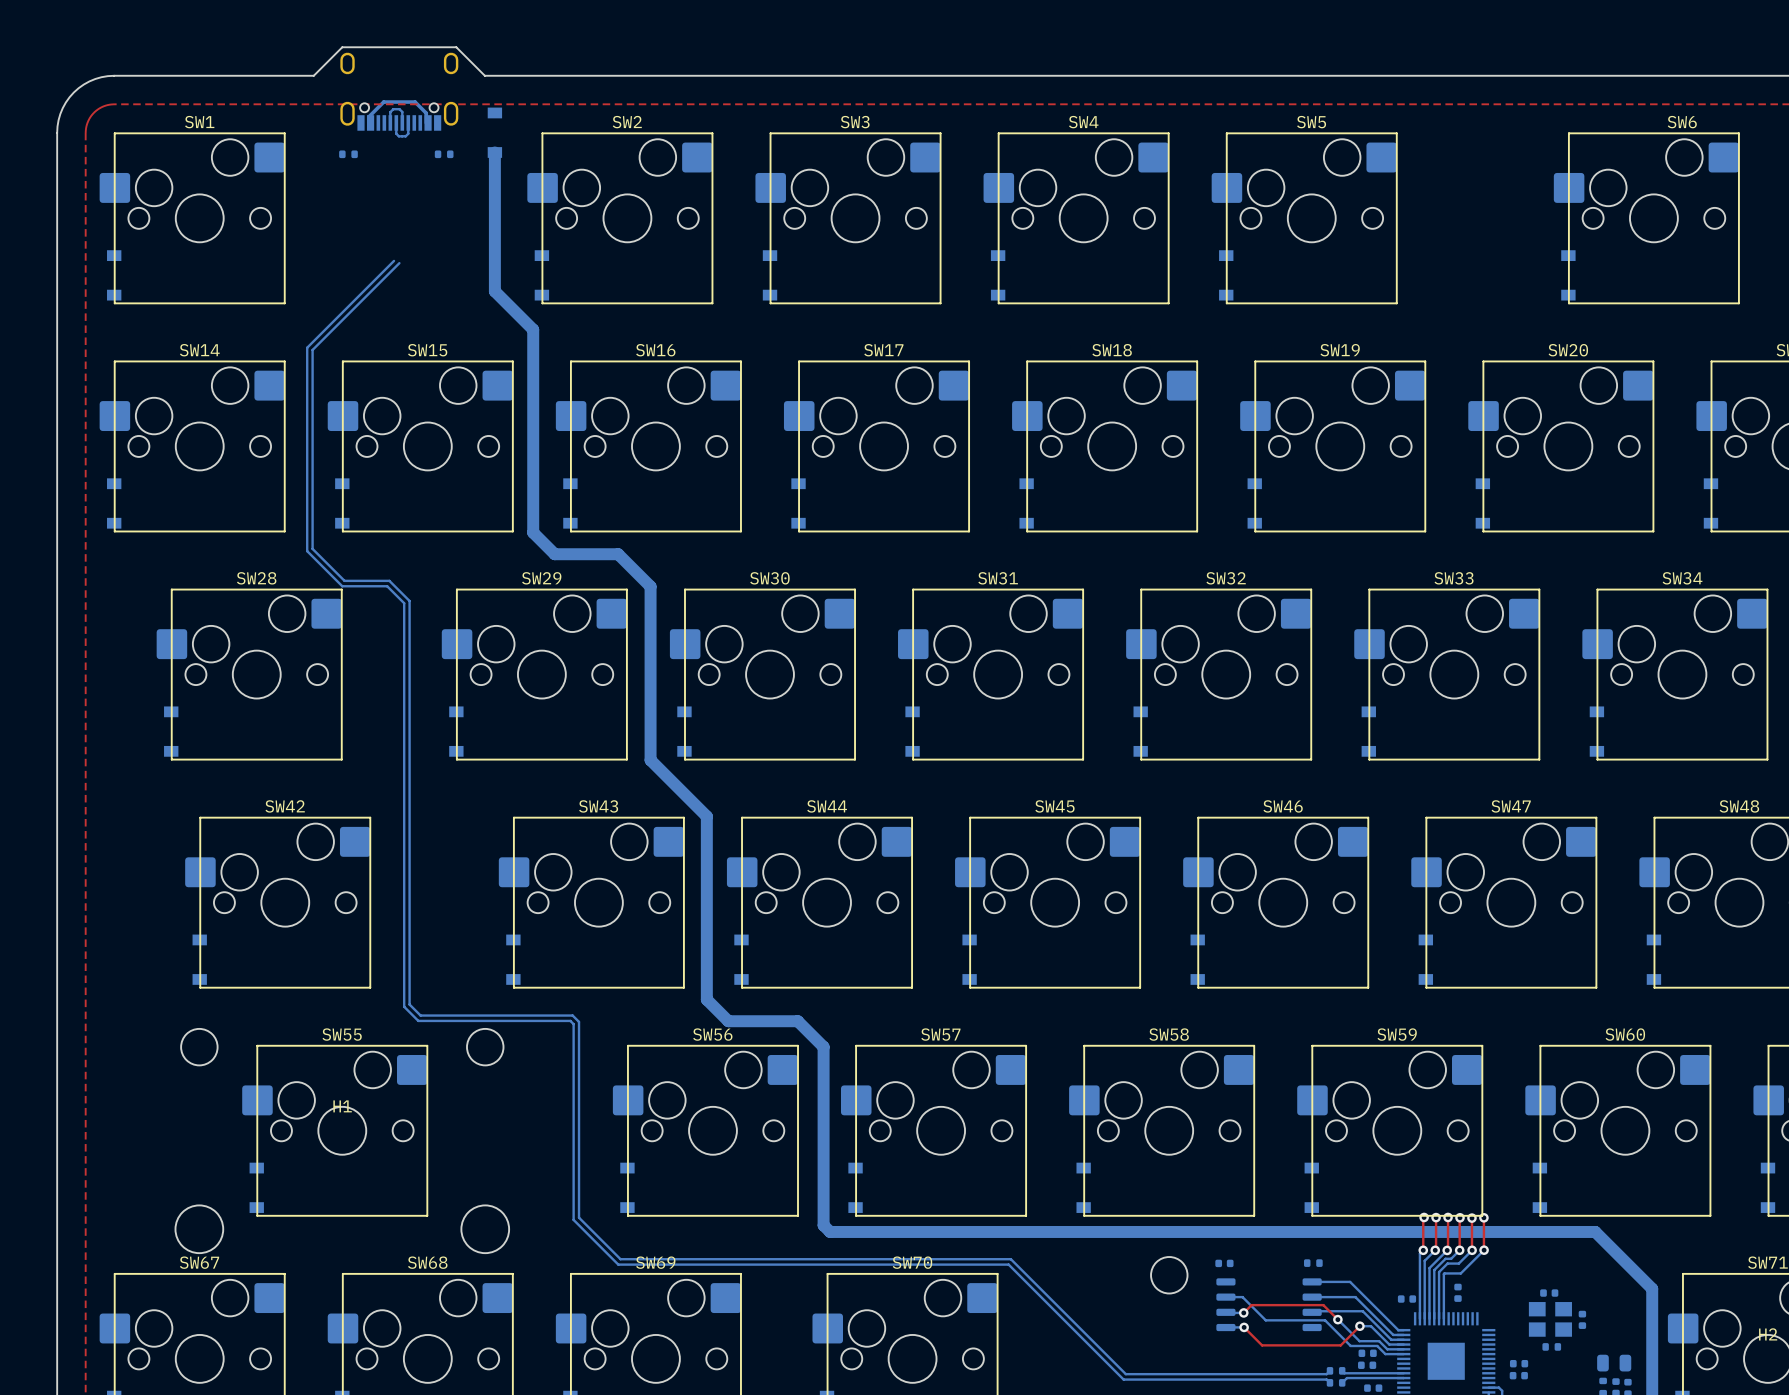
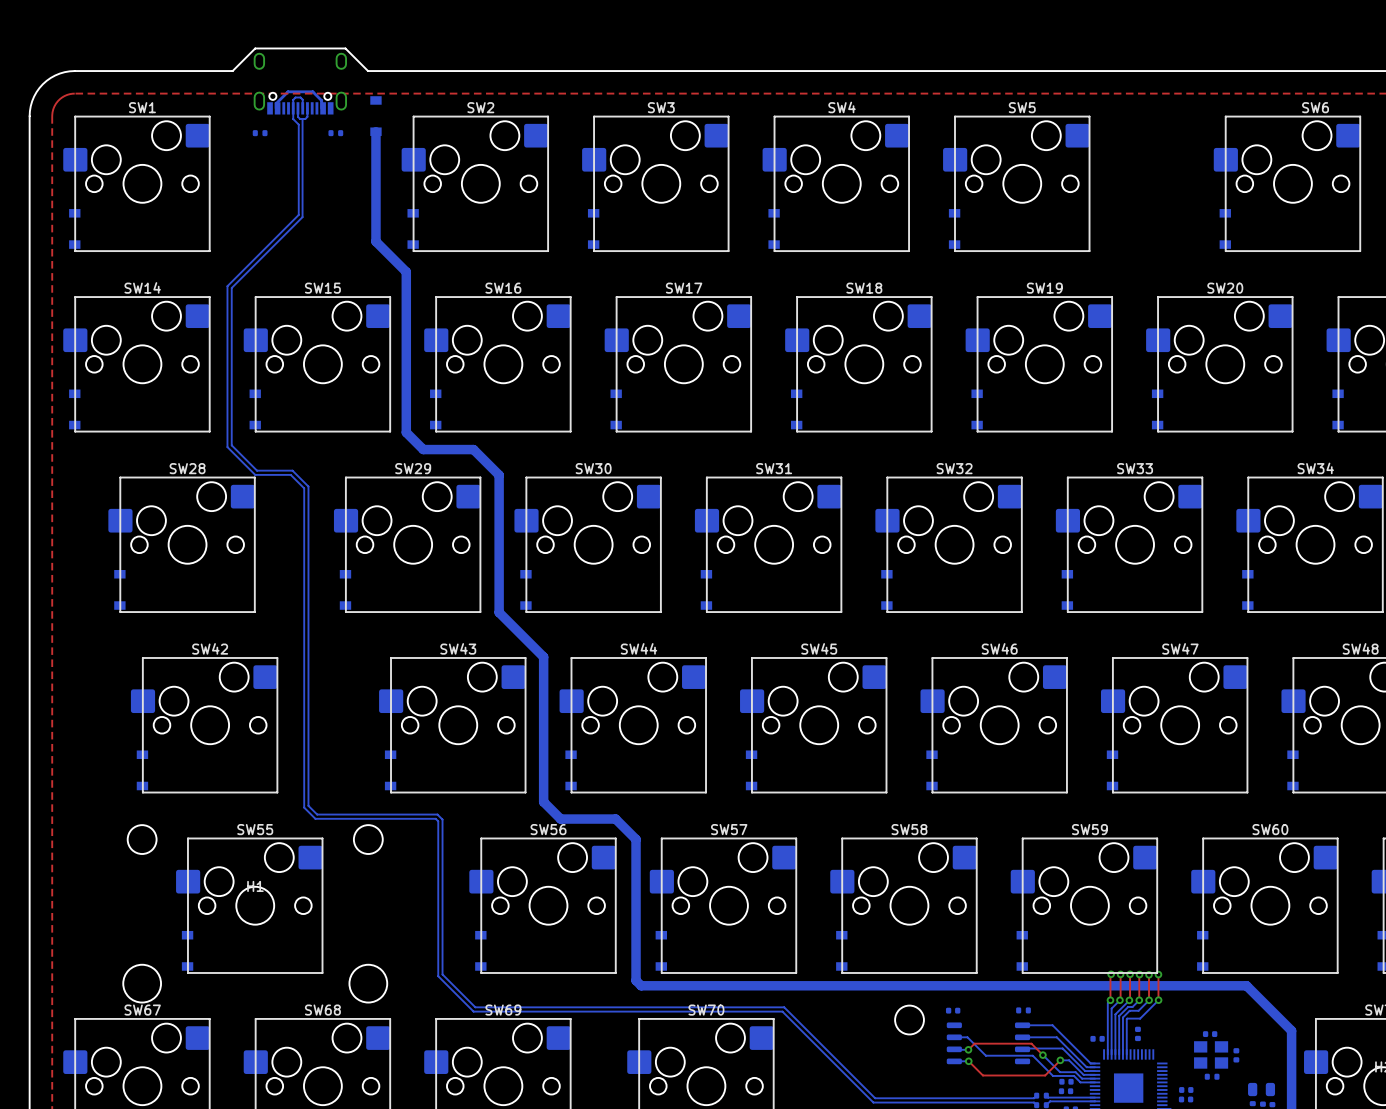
bottom track: none -> (293, 108) (293, 119) (298, 124) (298, 214) (296, 217)
bottom track: none -> (302, 118) (302, 217) (300, 219)

